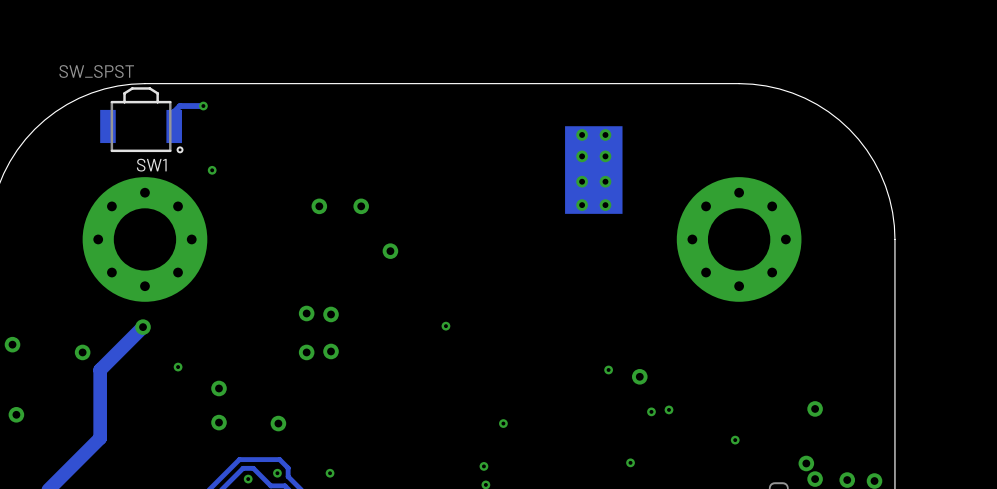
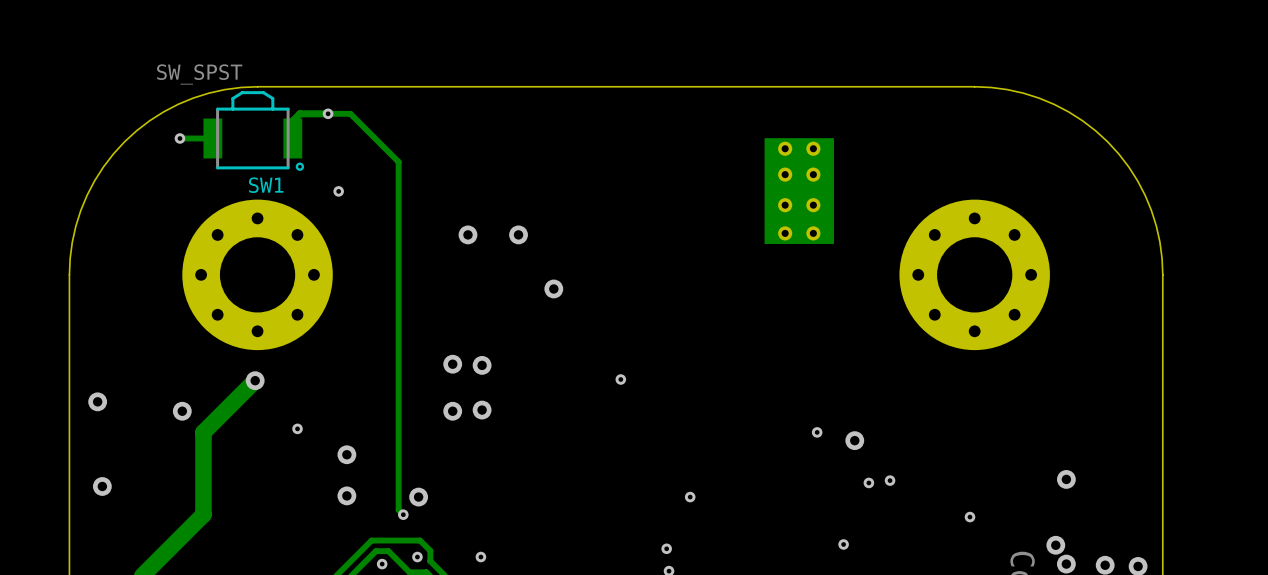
track: none -> (328, 113) (350, 113) (398, 162) (398, 509) (403, 514)
via: none -> (179, 138)
track: none -> (212, 138) (179, 138)
via: none -> (403, 514)

